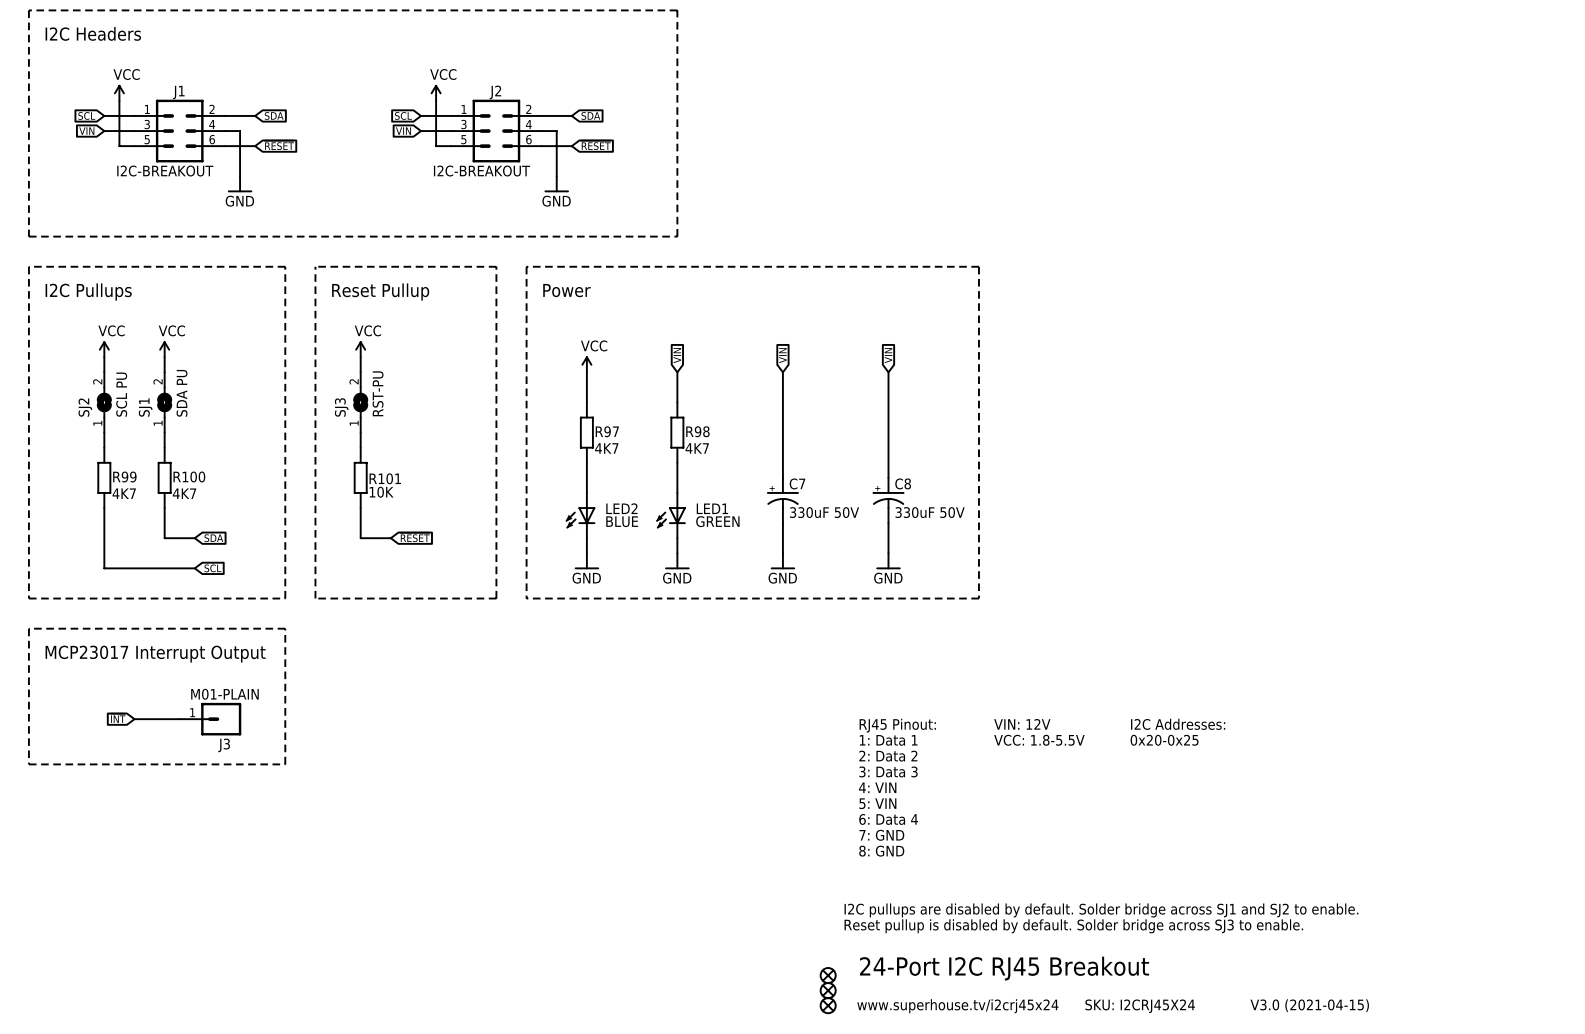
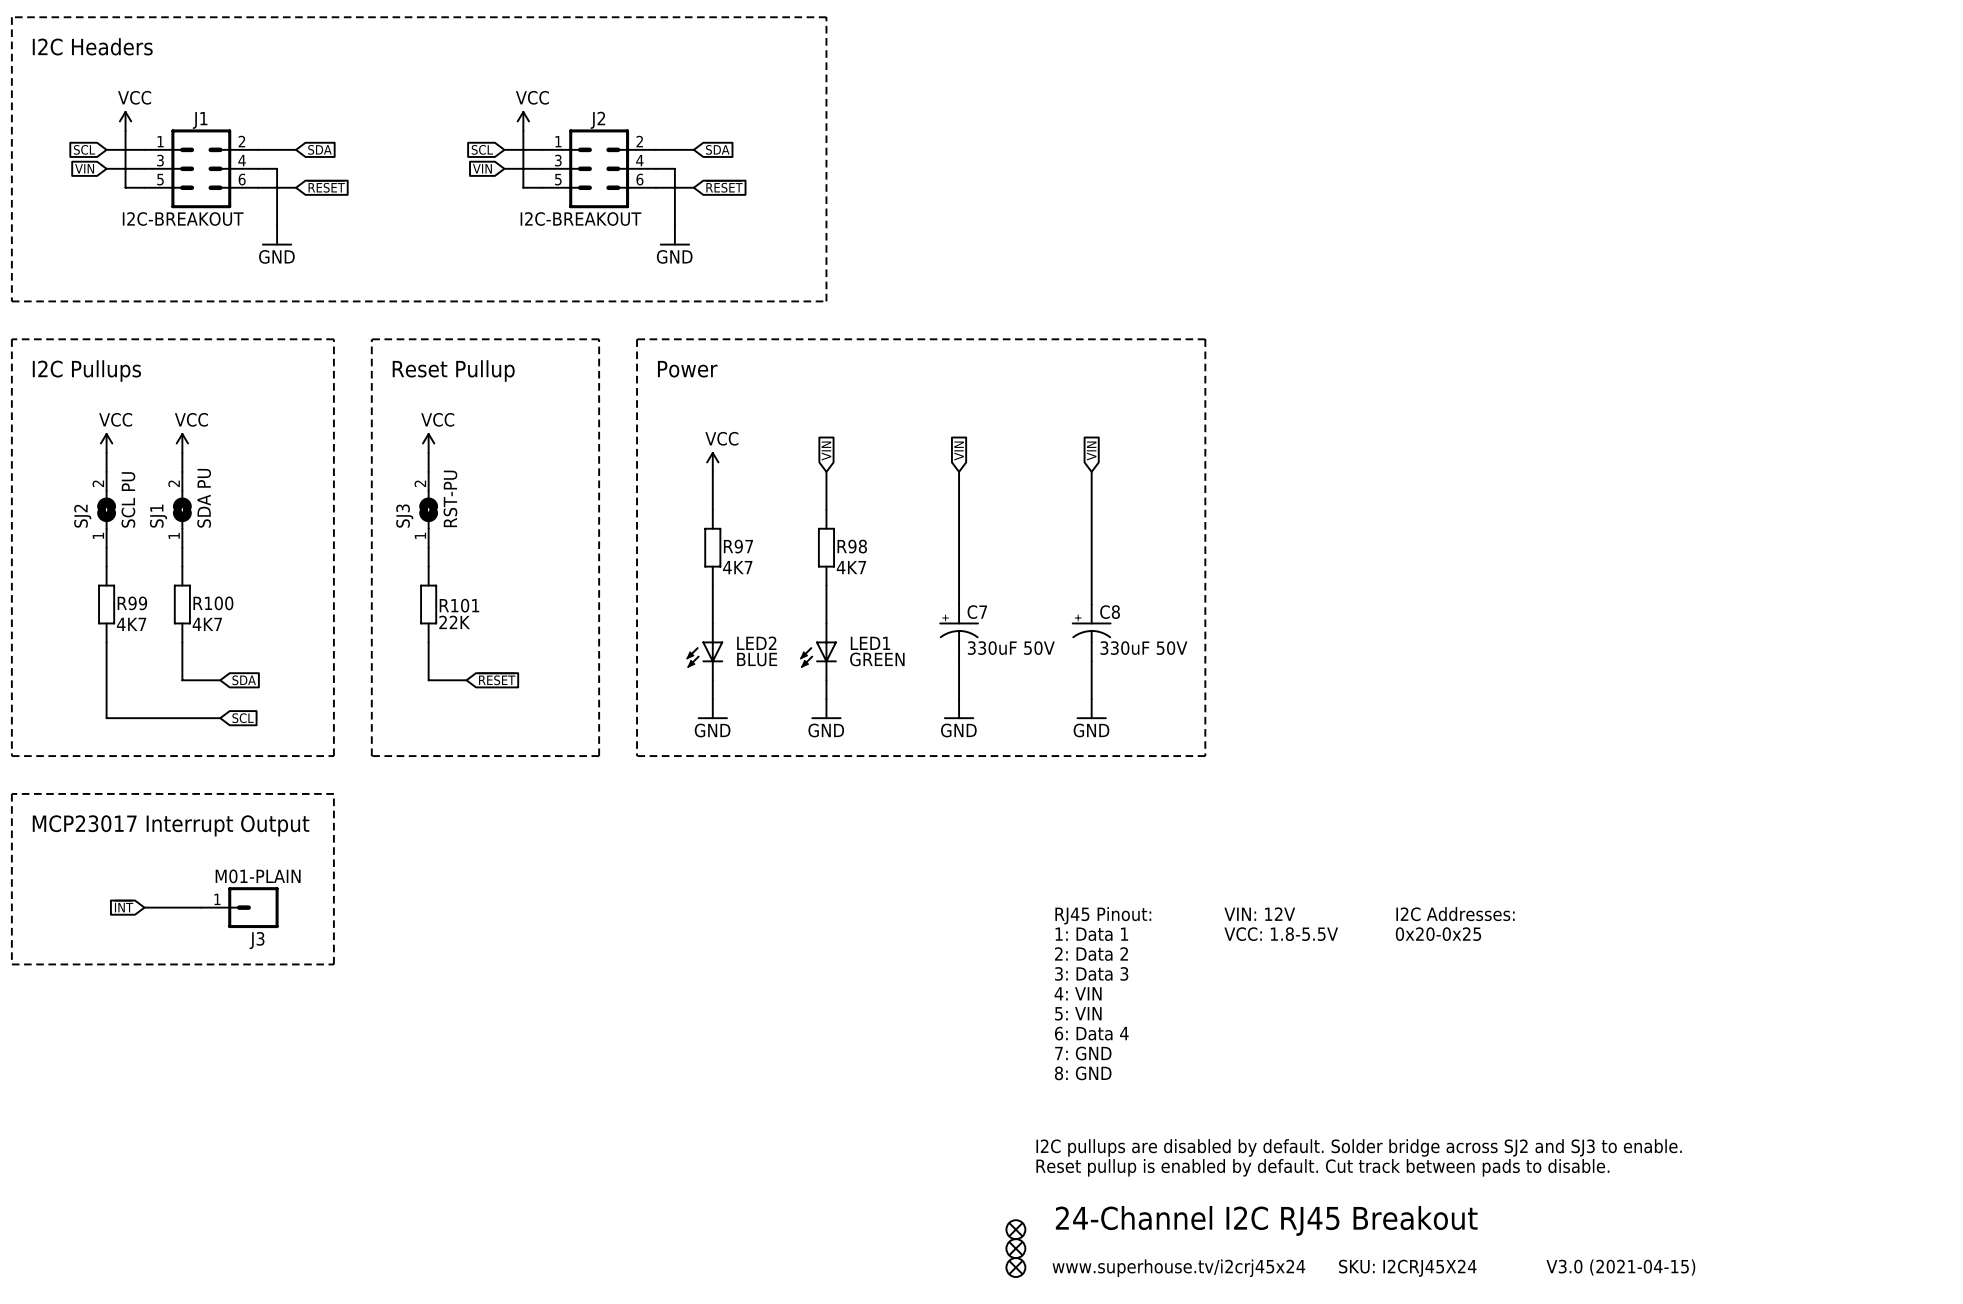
R101 value: 10K (381, 492) -> 22K (454, 622)
text: I2C pullups are disabled by default. Solder bridge across SJ1 and SJ2 to enable. (1101, 910) -> I2C pullups are disabled by default. Solder bridge across SJ2 and SJ3 to enable. (1359, 1147)
text: Reset pullup is disabled by default. Solder bridge across SJ3 to enable. (1073, 926) -> Reset pullup is enabled by default. Cut track between pads to disable. (1322, 1167)
text: 24-Port I2C RJ45 Breakout (1004, 968) -> 24-Channel I2C RJ45 Breakout (1266, 1220)

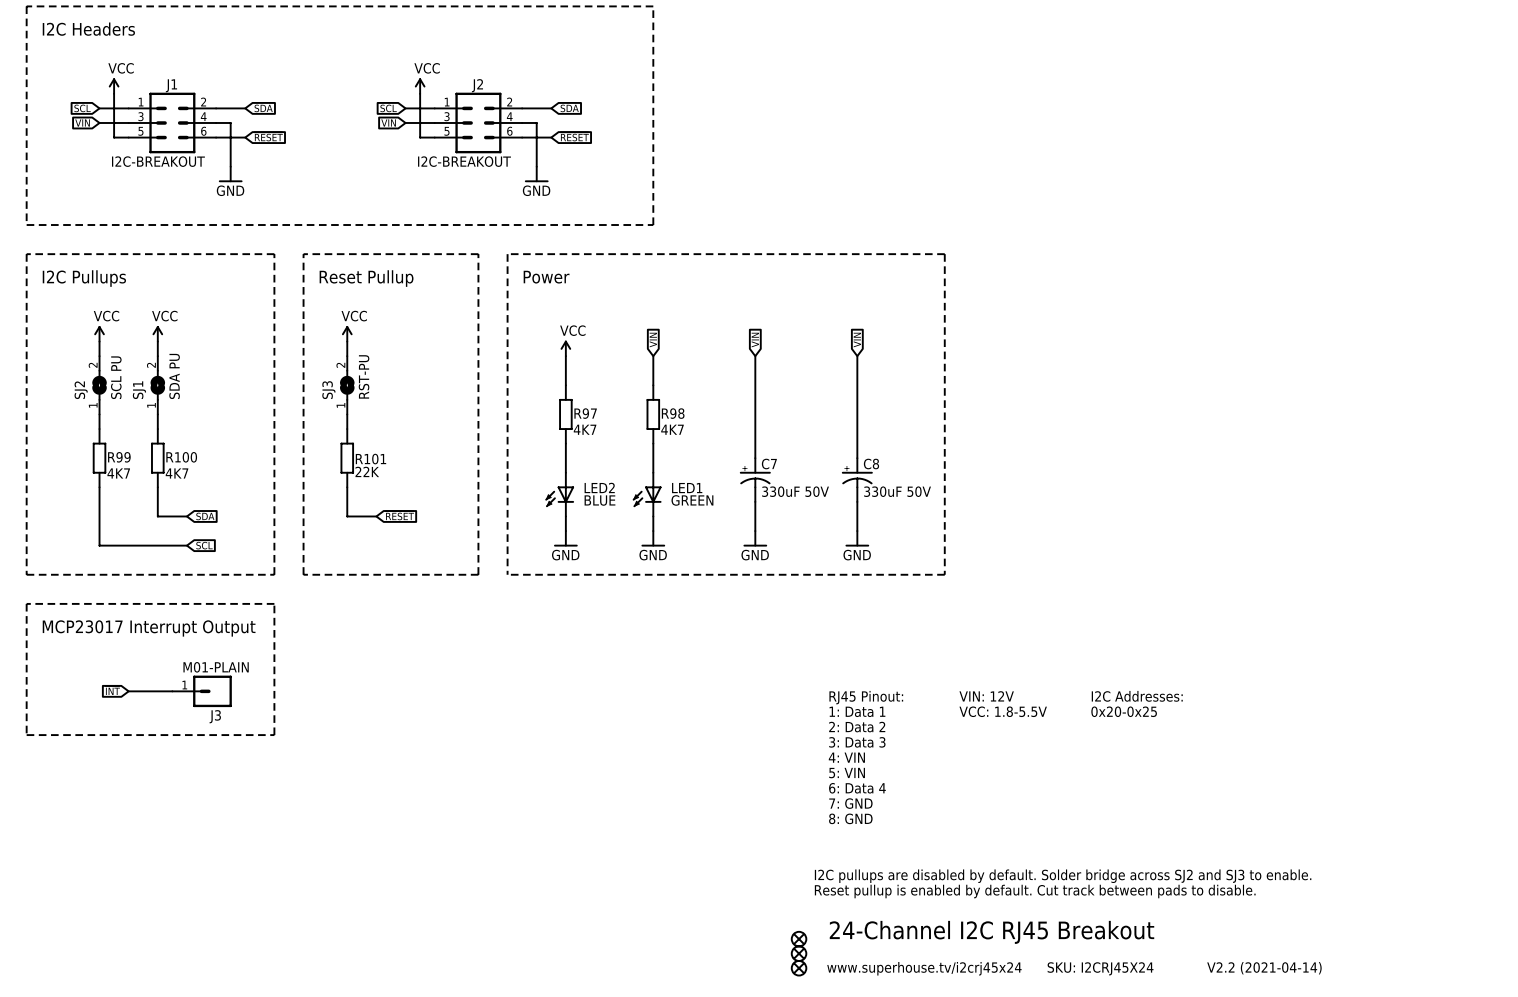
text: V3.0 (2021-04-15) (1620, 1267) -> V2.2 (2021-04-14) (1264, 968)

